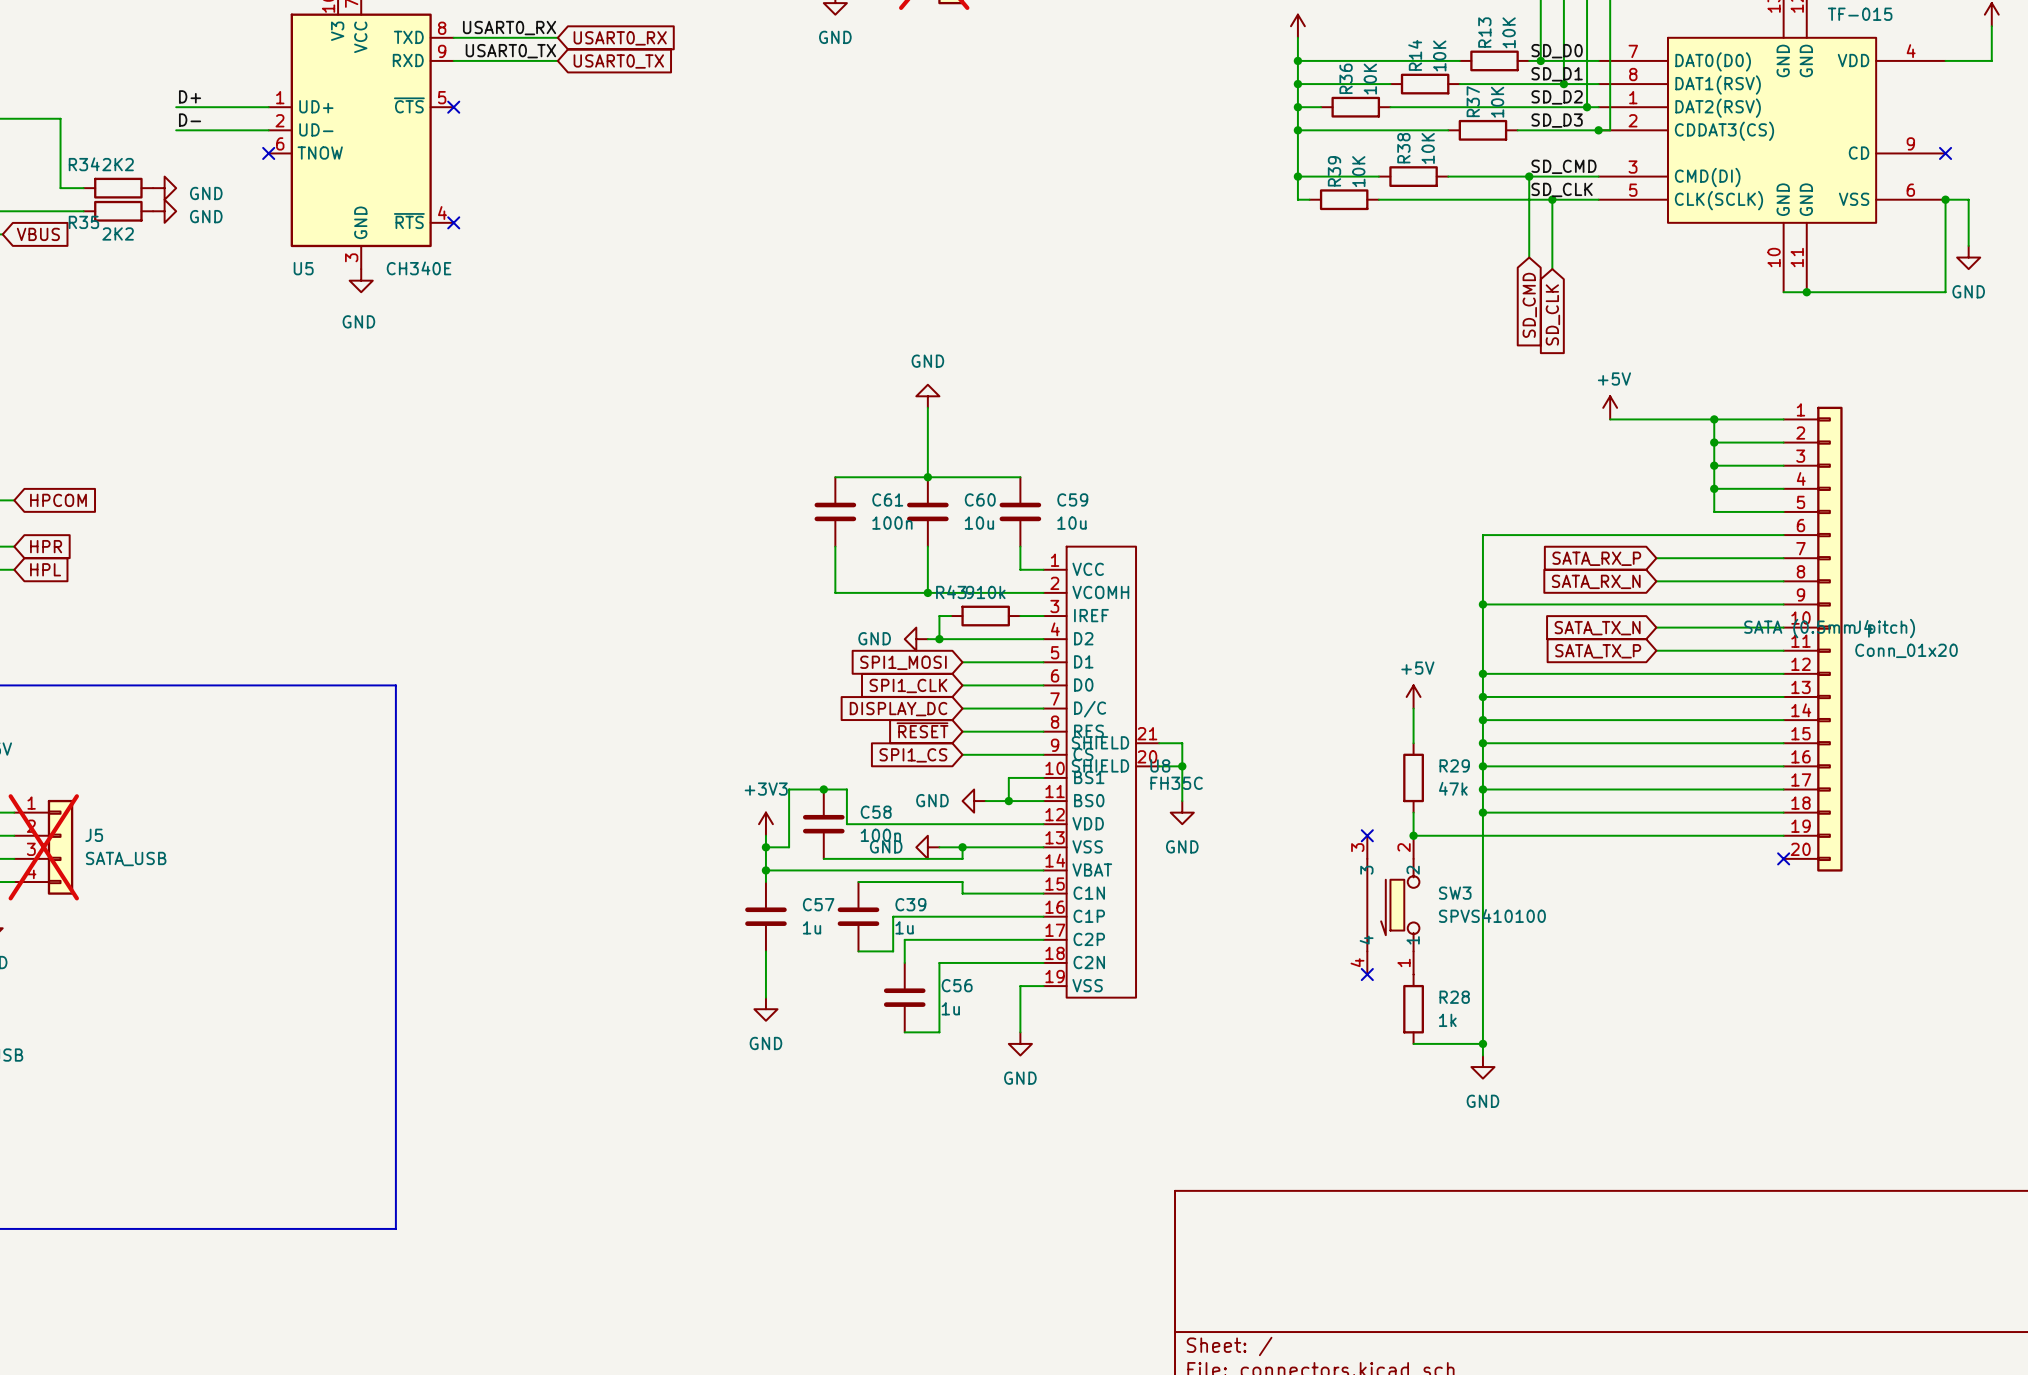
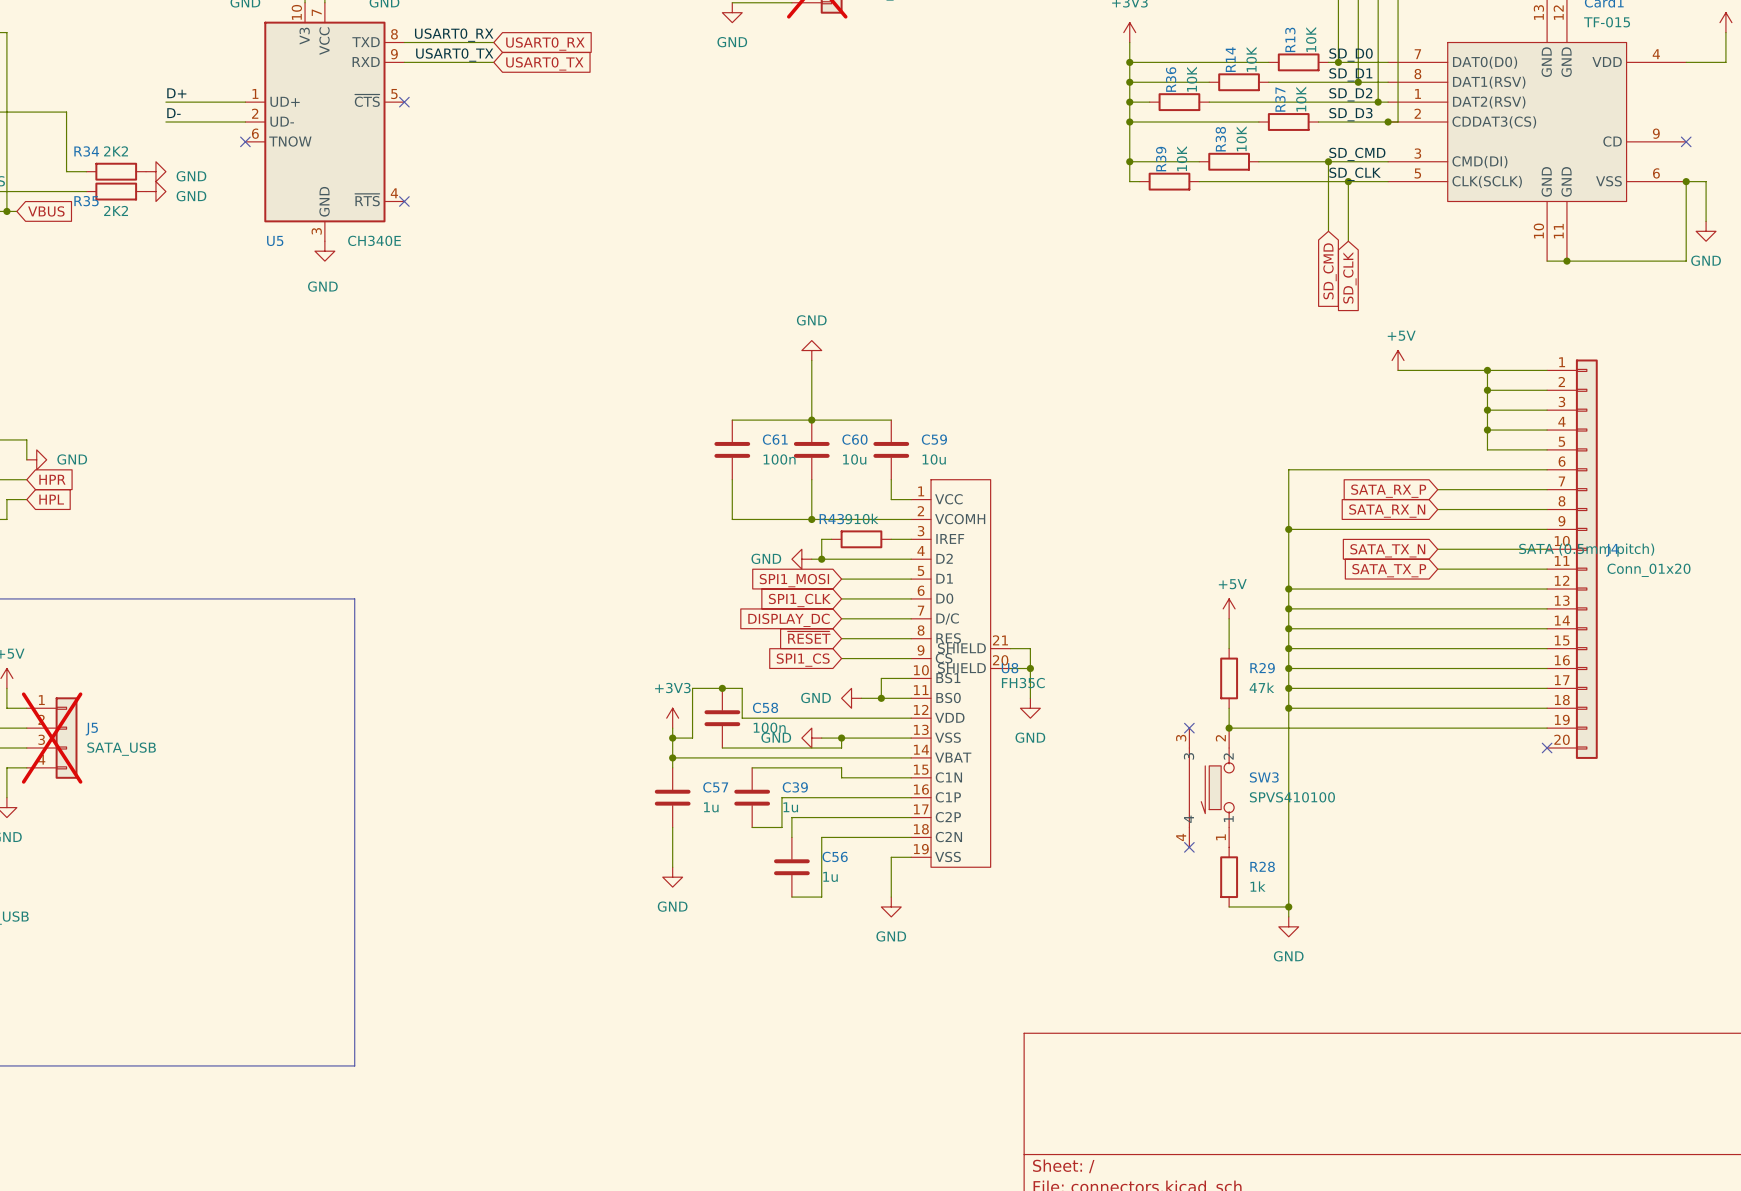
wire: none -> (26, 439) (26, 459)
global label: HPCOM (58, 500) -> none
power symbol: none -> GND (36, 459)

